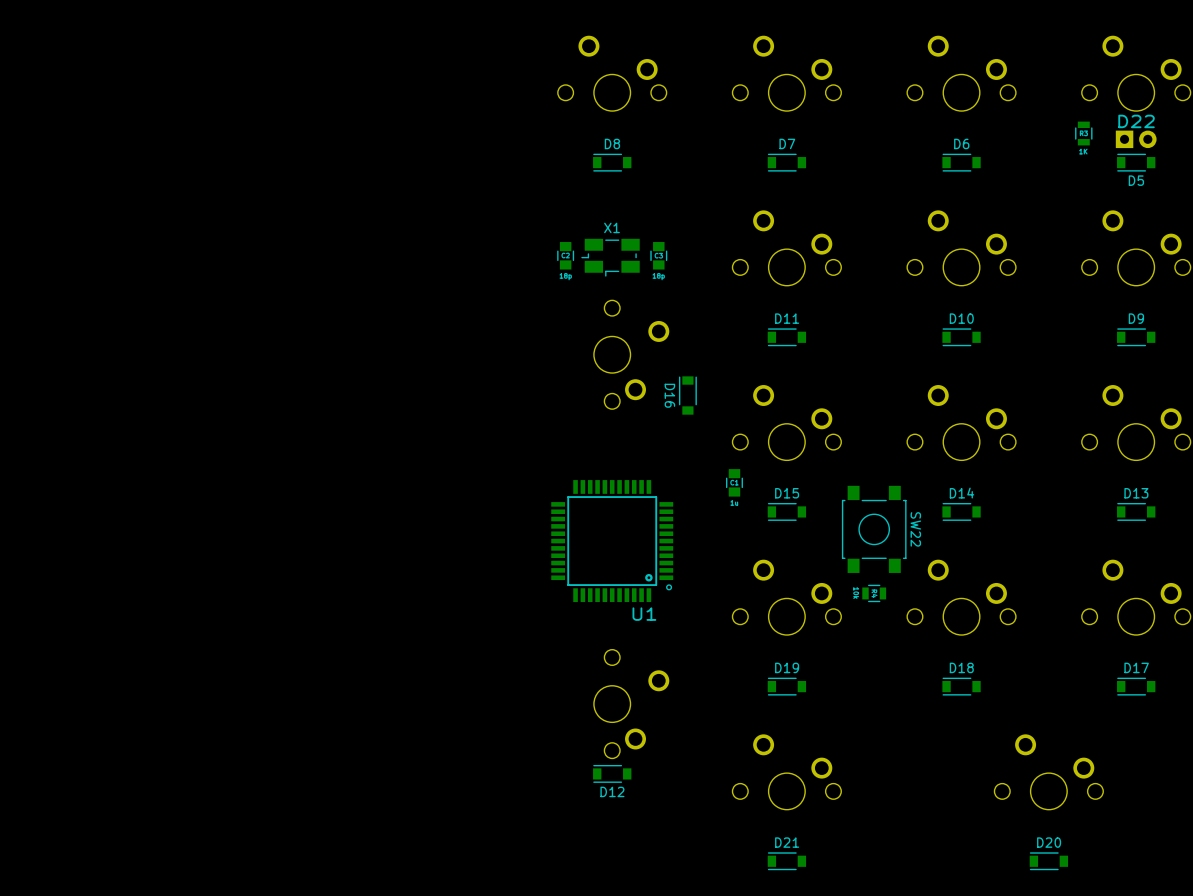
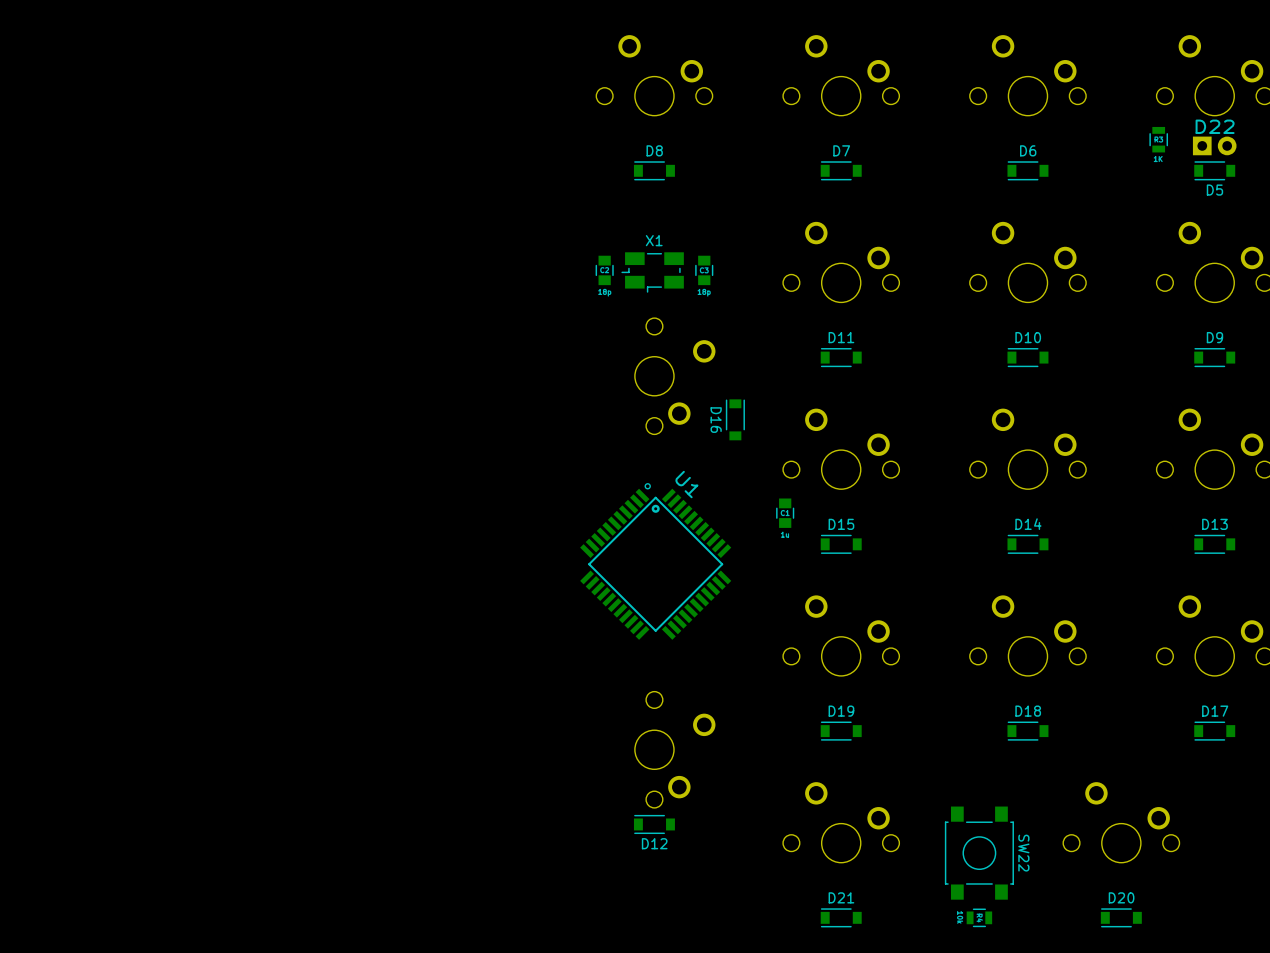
SW22 position: (874, 529) -> (979, 853)
U1 rotation: 0° (612, 541) -> 135° counterclockwise (655, 561)
part position: (874, 593) -> (979, 917)

